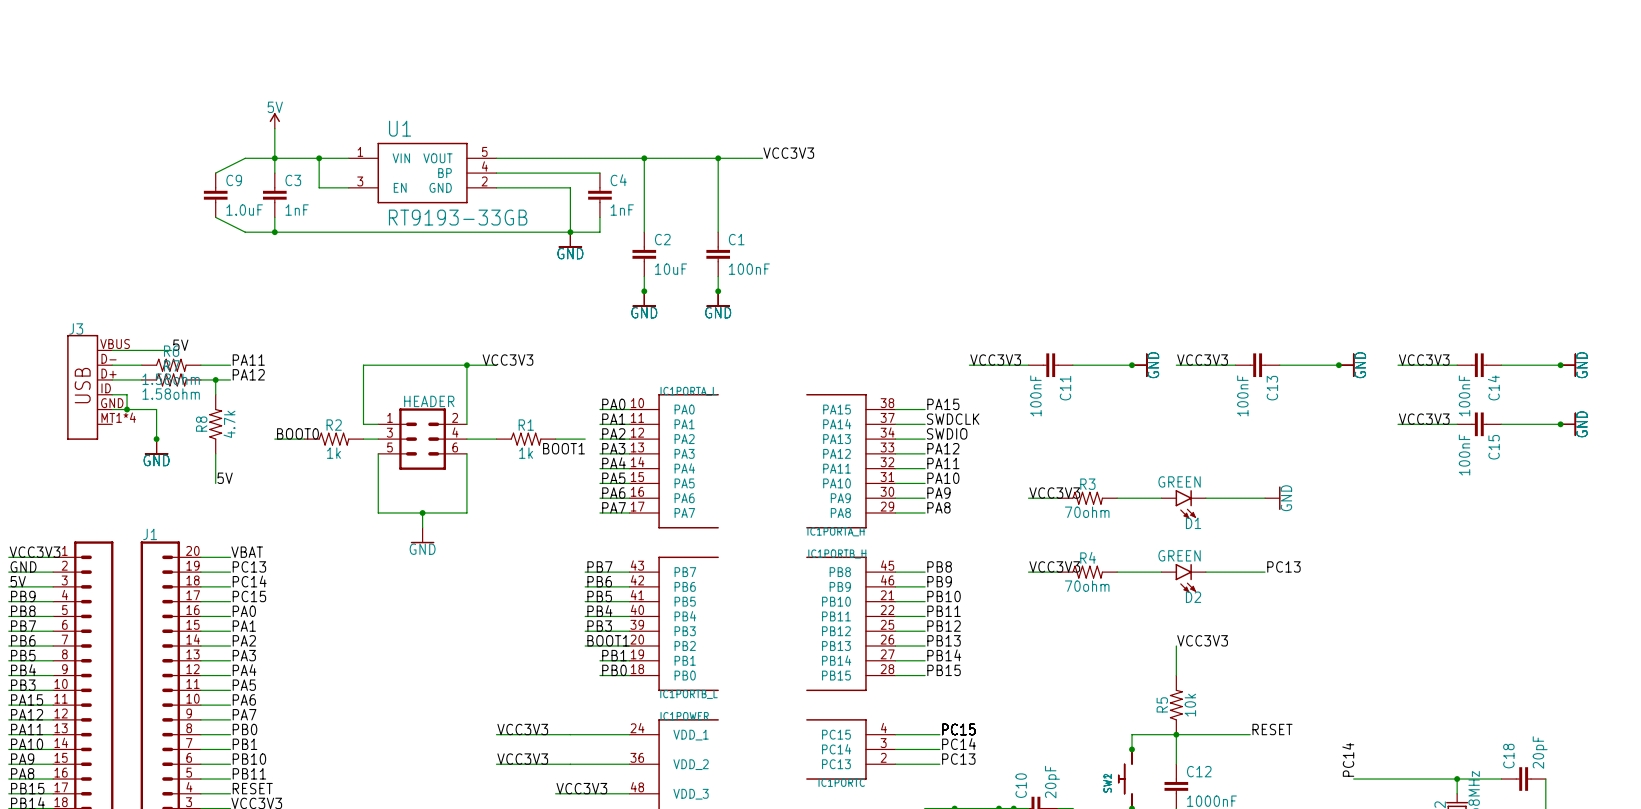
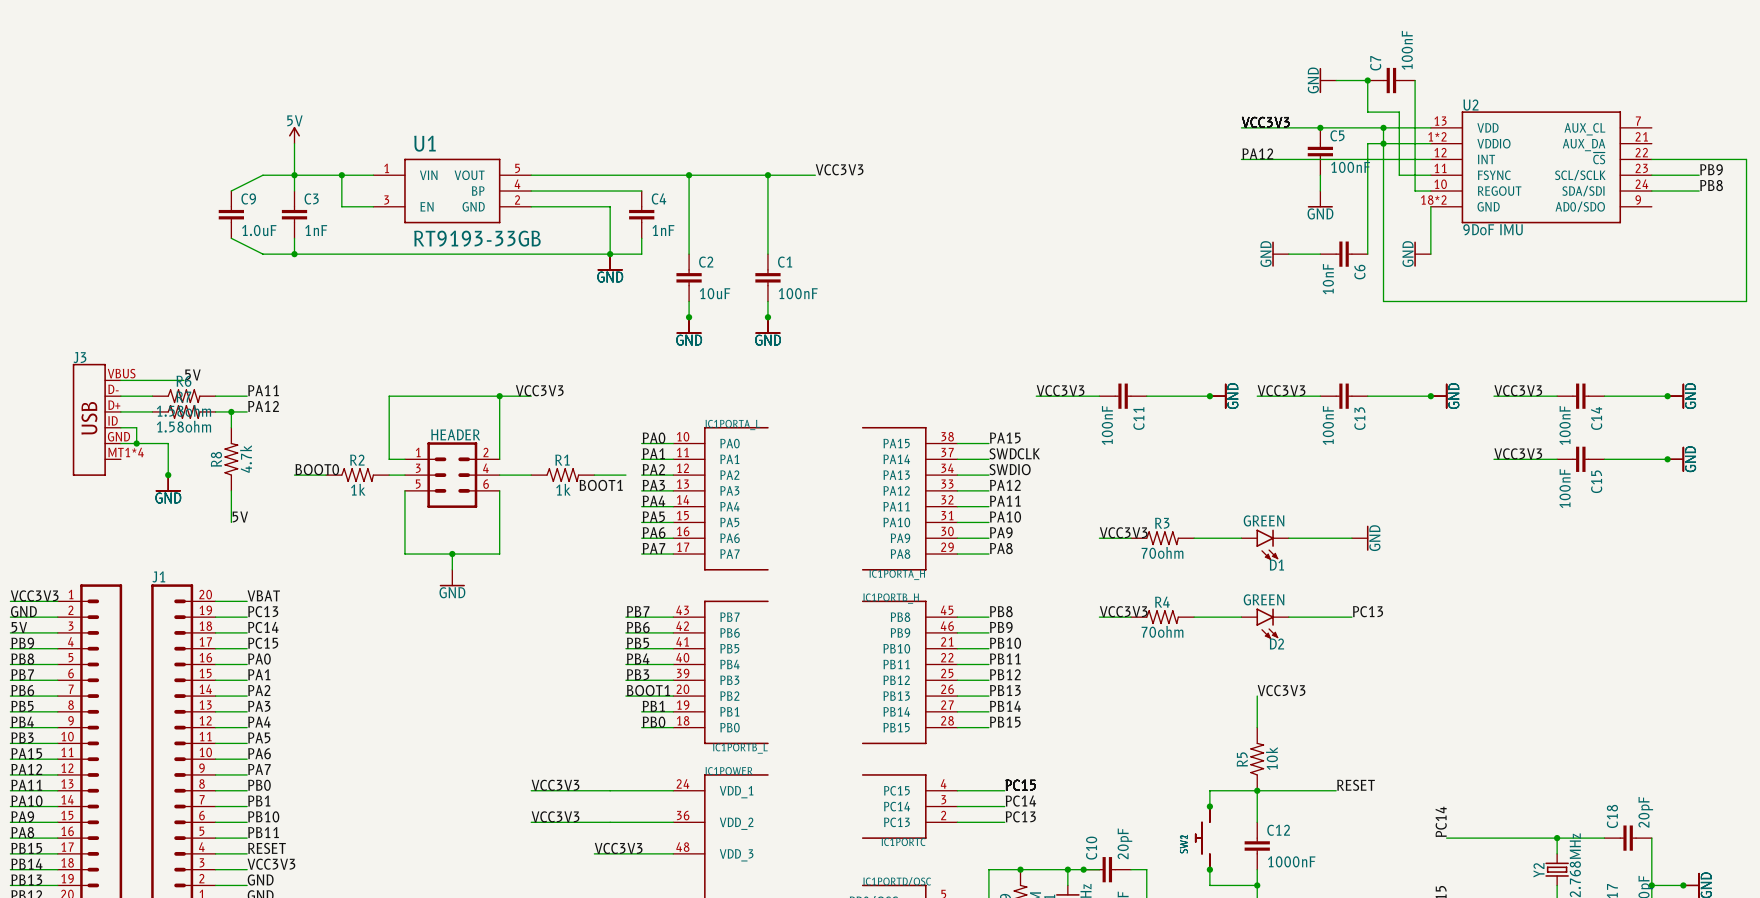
power symbol: none -> GND (1327, 80)
wire: none -> (1336, 80) (1367, 80) (1367, 112) (1399, 112) (1399, 175) (1430, 175)
junction: none -> (1367, 80)
C7: none -> 100nF (1391, 80)
wire: none -> (1415, 80) (1415, 191) (1430, 191)
label: none -> VCC3V3 (1265, 122)
wire: none -> (1241, 127) (1430, 127)
junction: none -> (1320, 127)
wire: none -> (1383, 127) (1383, 301) (1746, 301) (1746, 159) (1651, 159)
junction: none -> (1383, 127)
junction: none -> (1383, 143)
wire: none -> (1430, 143) (1367, 143) (1367, 254)
C5: none -> 100nF (1320, 151)
label: none -> PA12 (1257, 153)
wire: none -> (1241, 159) (1430, 159)
U2: none -> 9DoF IMU (1541, 167)
label: none -> PB9 (1711, 169)
wire: none -> (1320, 175) (1320, 191)
wire: none -> (1651, 175) (1699, 175)
label: none -> PB8 (1711, 185)
wire: none -> (1651, 191) (1699, 191)
power symbol: none -> GND (1320, 199)
wire: none -> (1430, 206) (1430, 254)
power symbol: none -> GND (1280, 254)
wire: none -> (1288, 254) (1320, 254)
C6: none -> 10nF (1344, 254)
power symbol: none -> GND (1422, 254)

